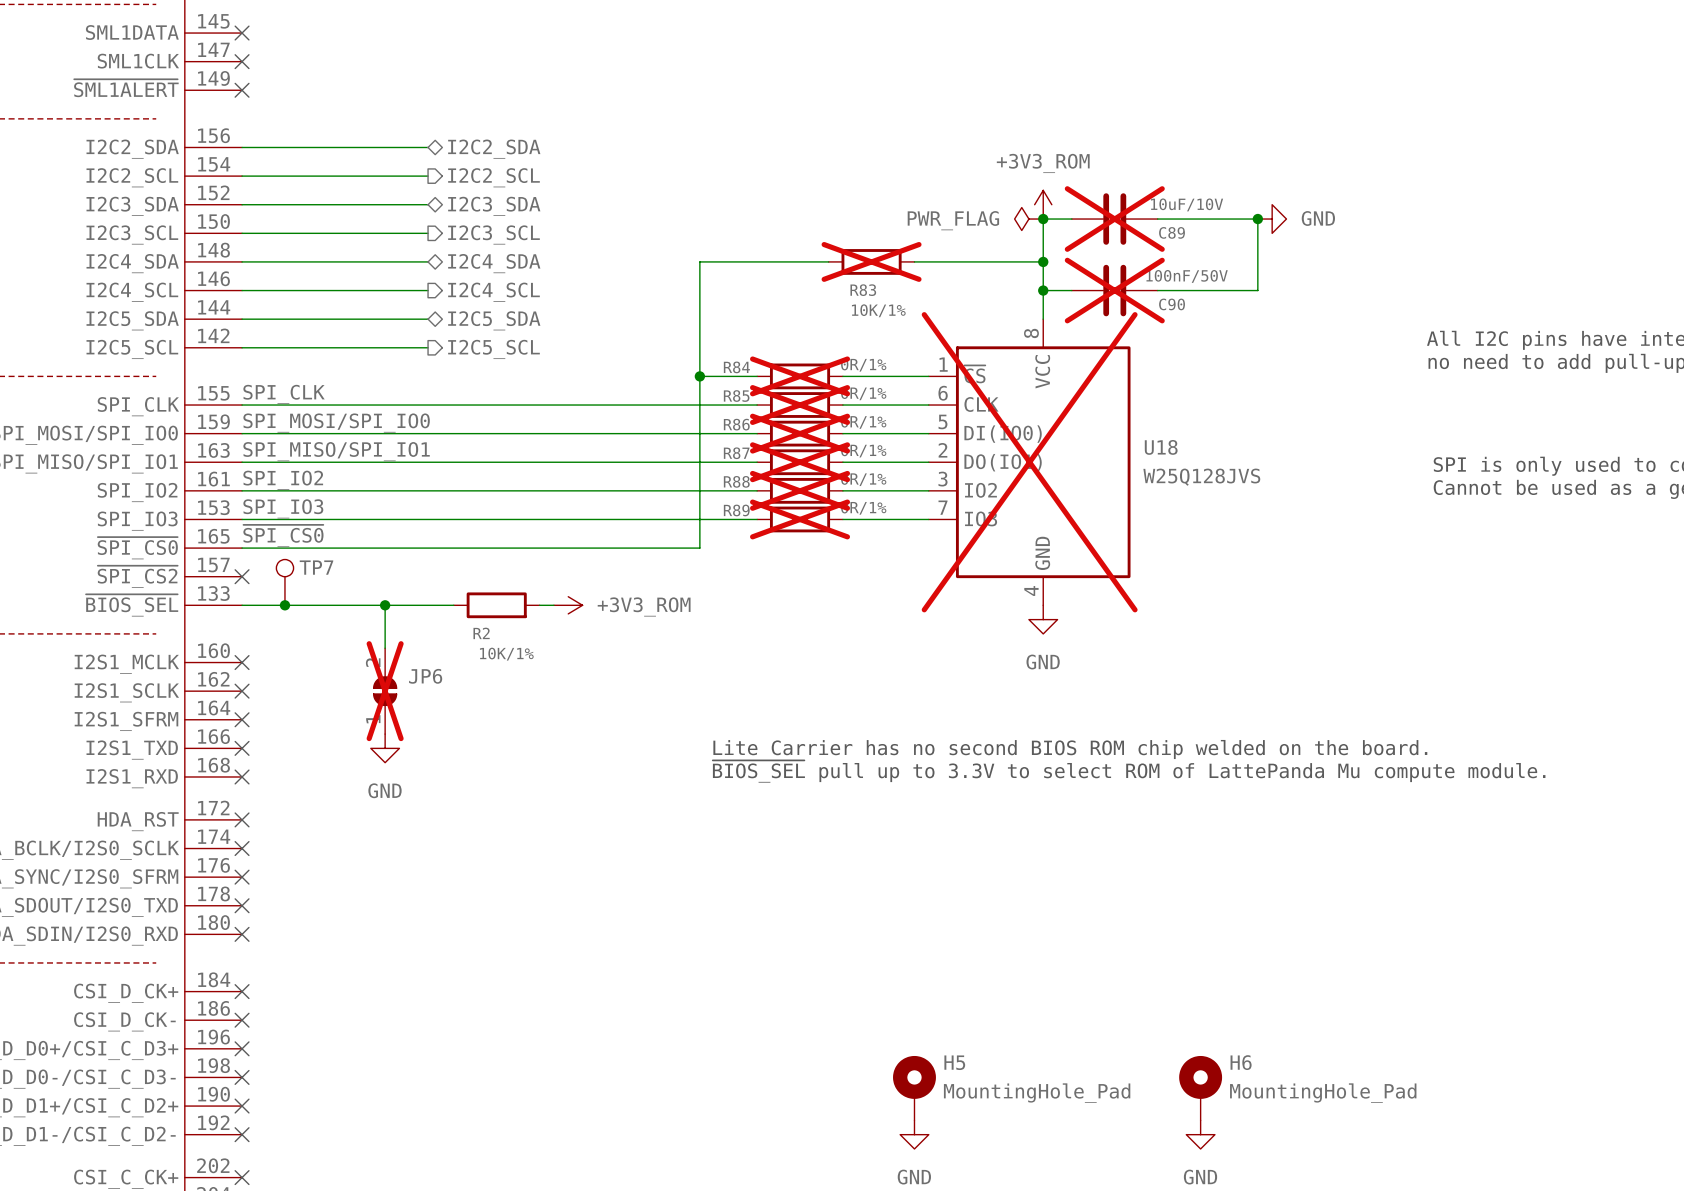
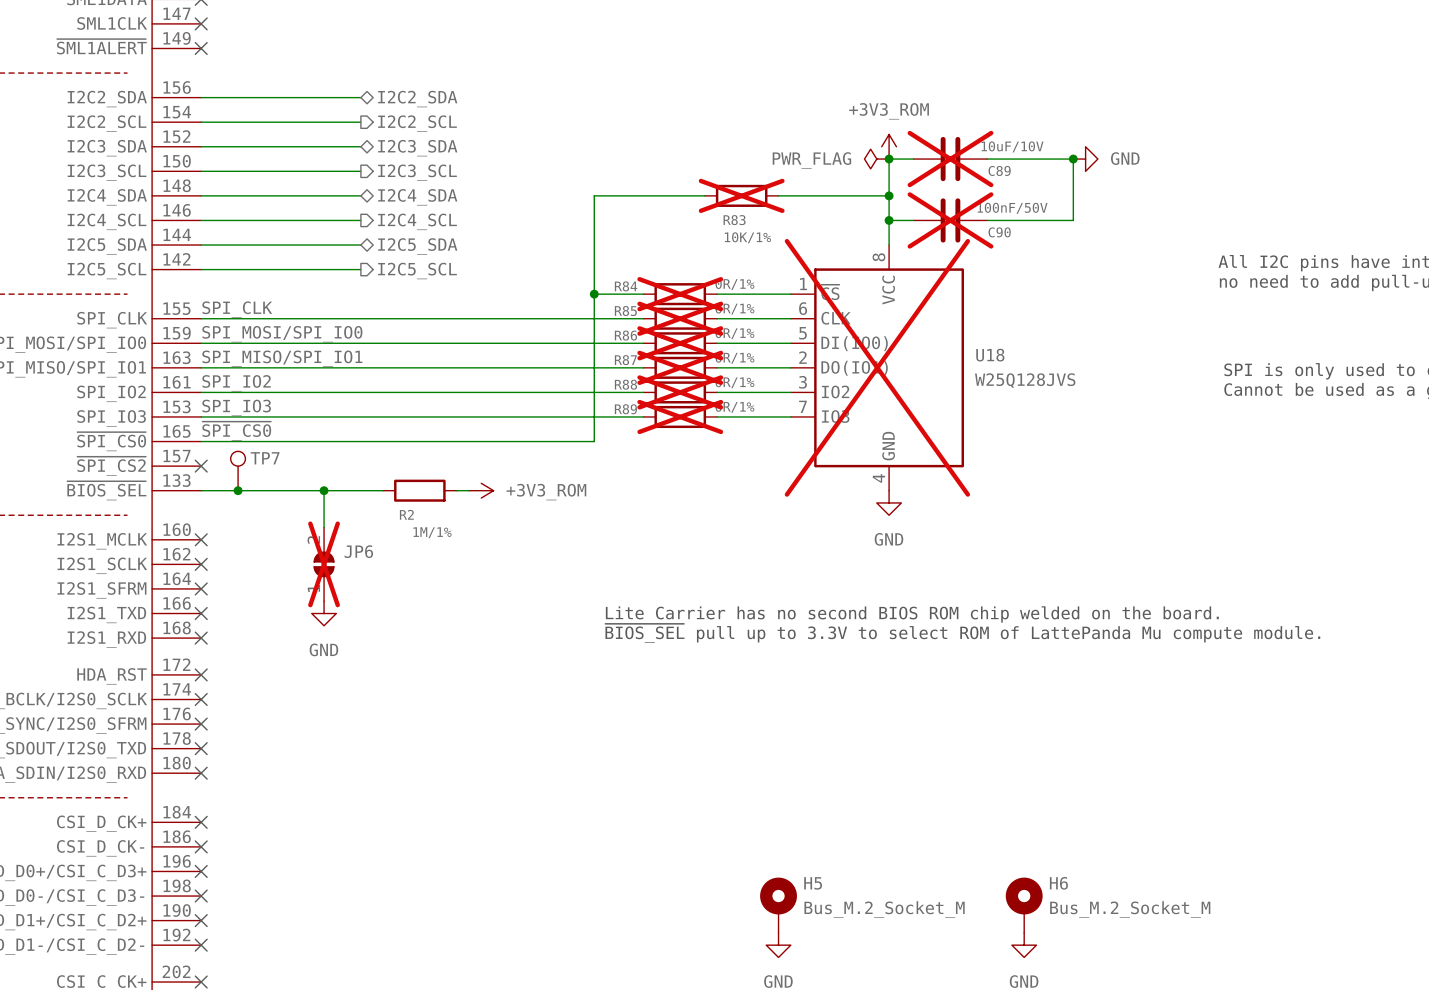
R2 value: 10K/1% (506, 654) -> 1M/1% (432, 532)
H5 value: MountingHole_Pad (1037, 1093) -> Bus_M.2_Socket_M (884, 909)
H6 value: MountingHole_Pad (1323, 1093) -> Bus_M.2_Socket_M (1130, 909)

